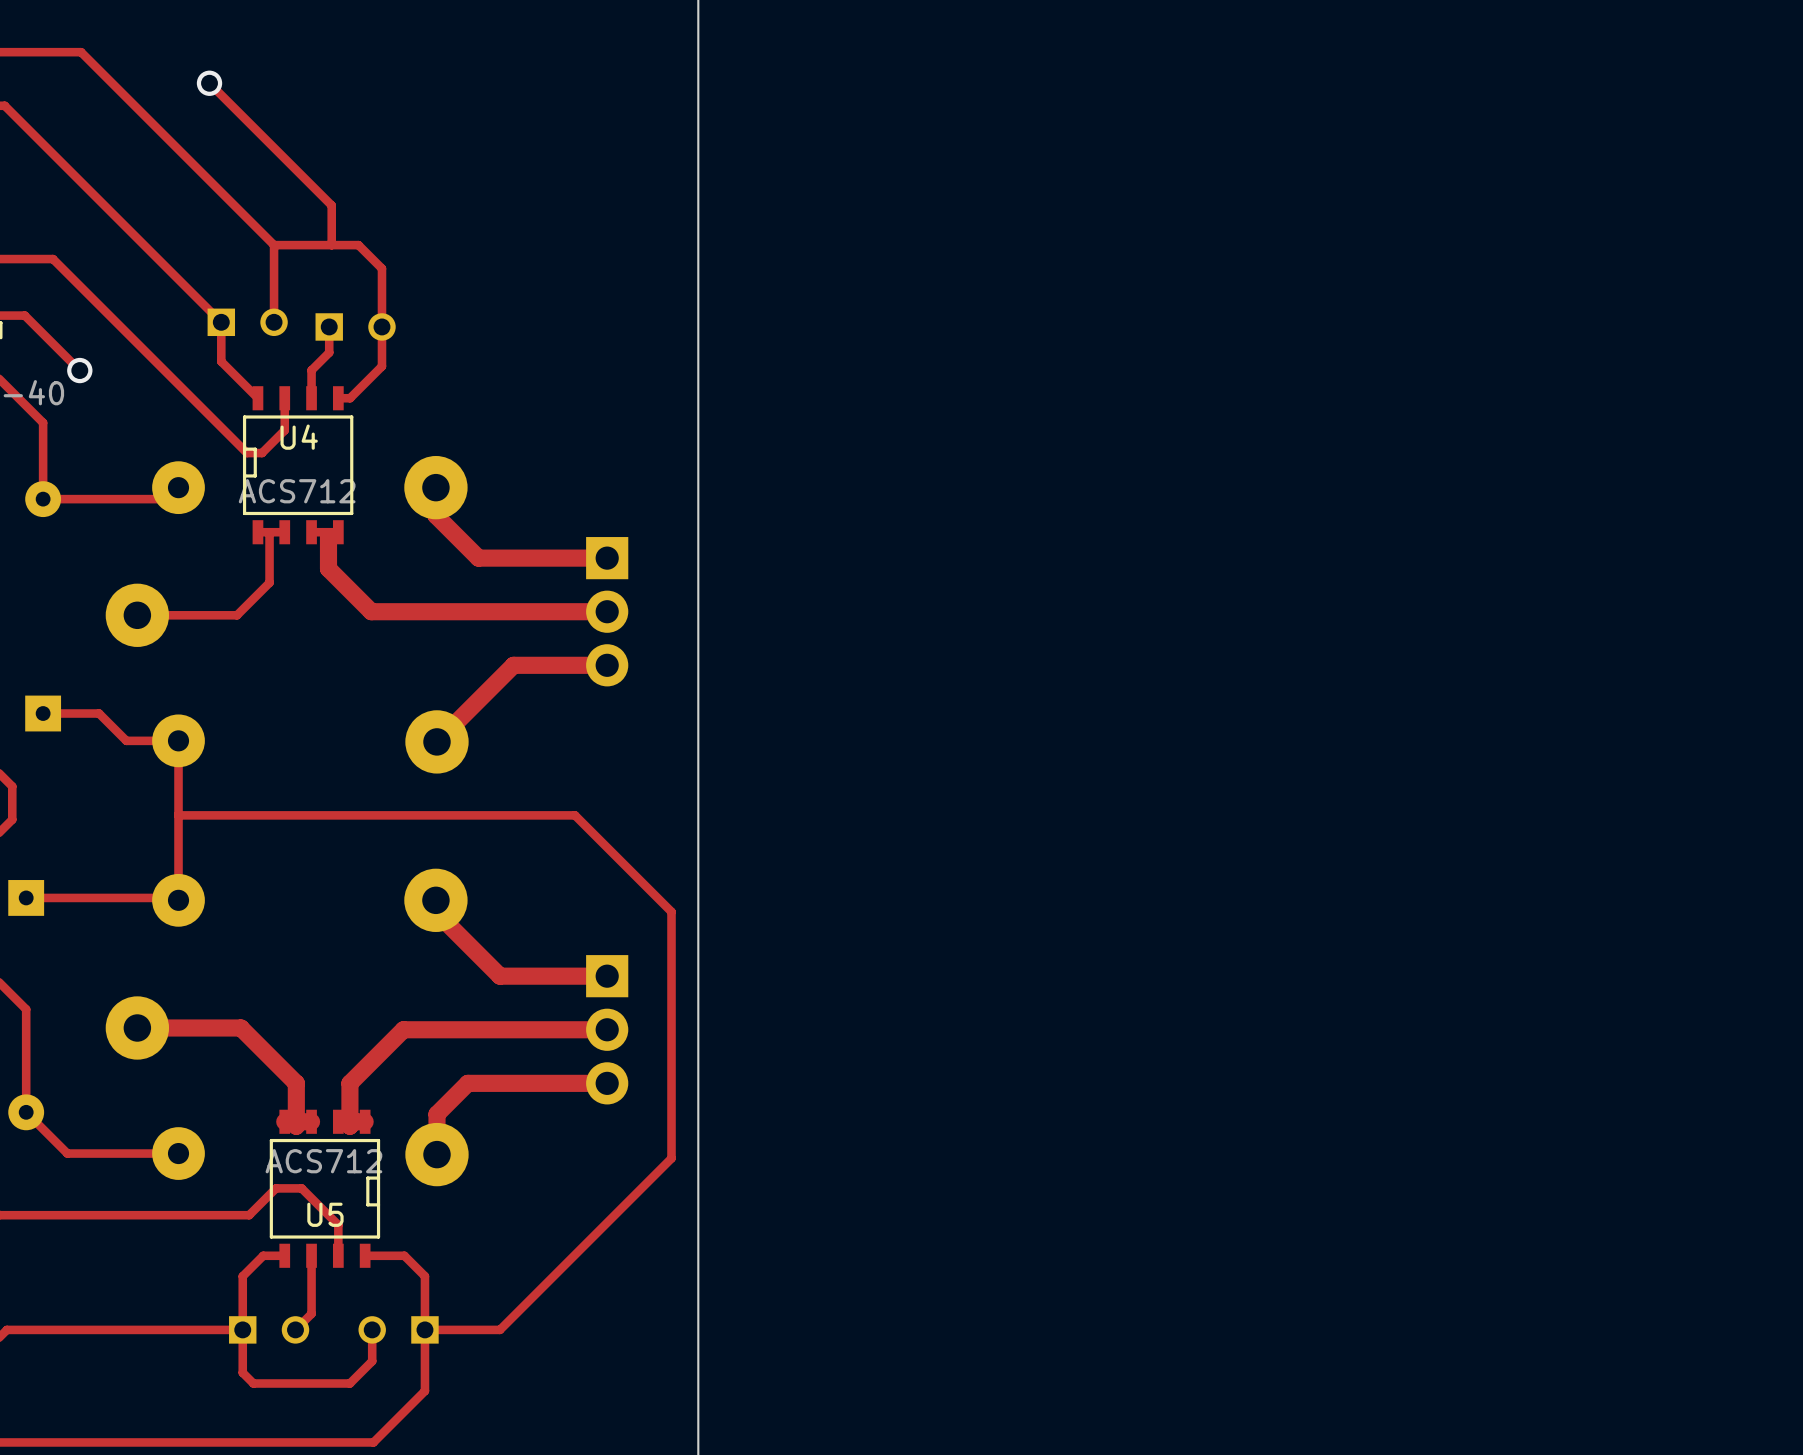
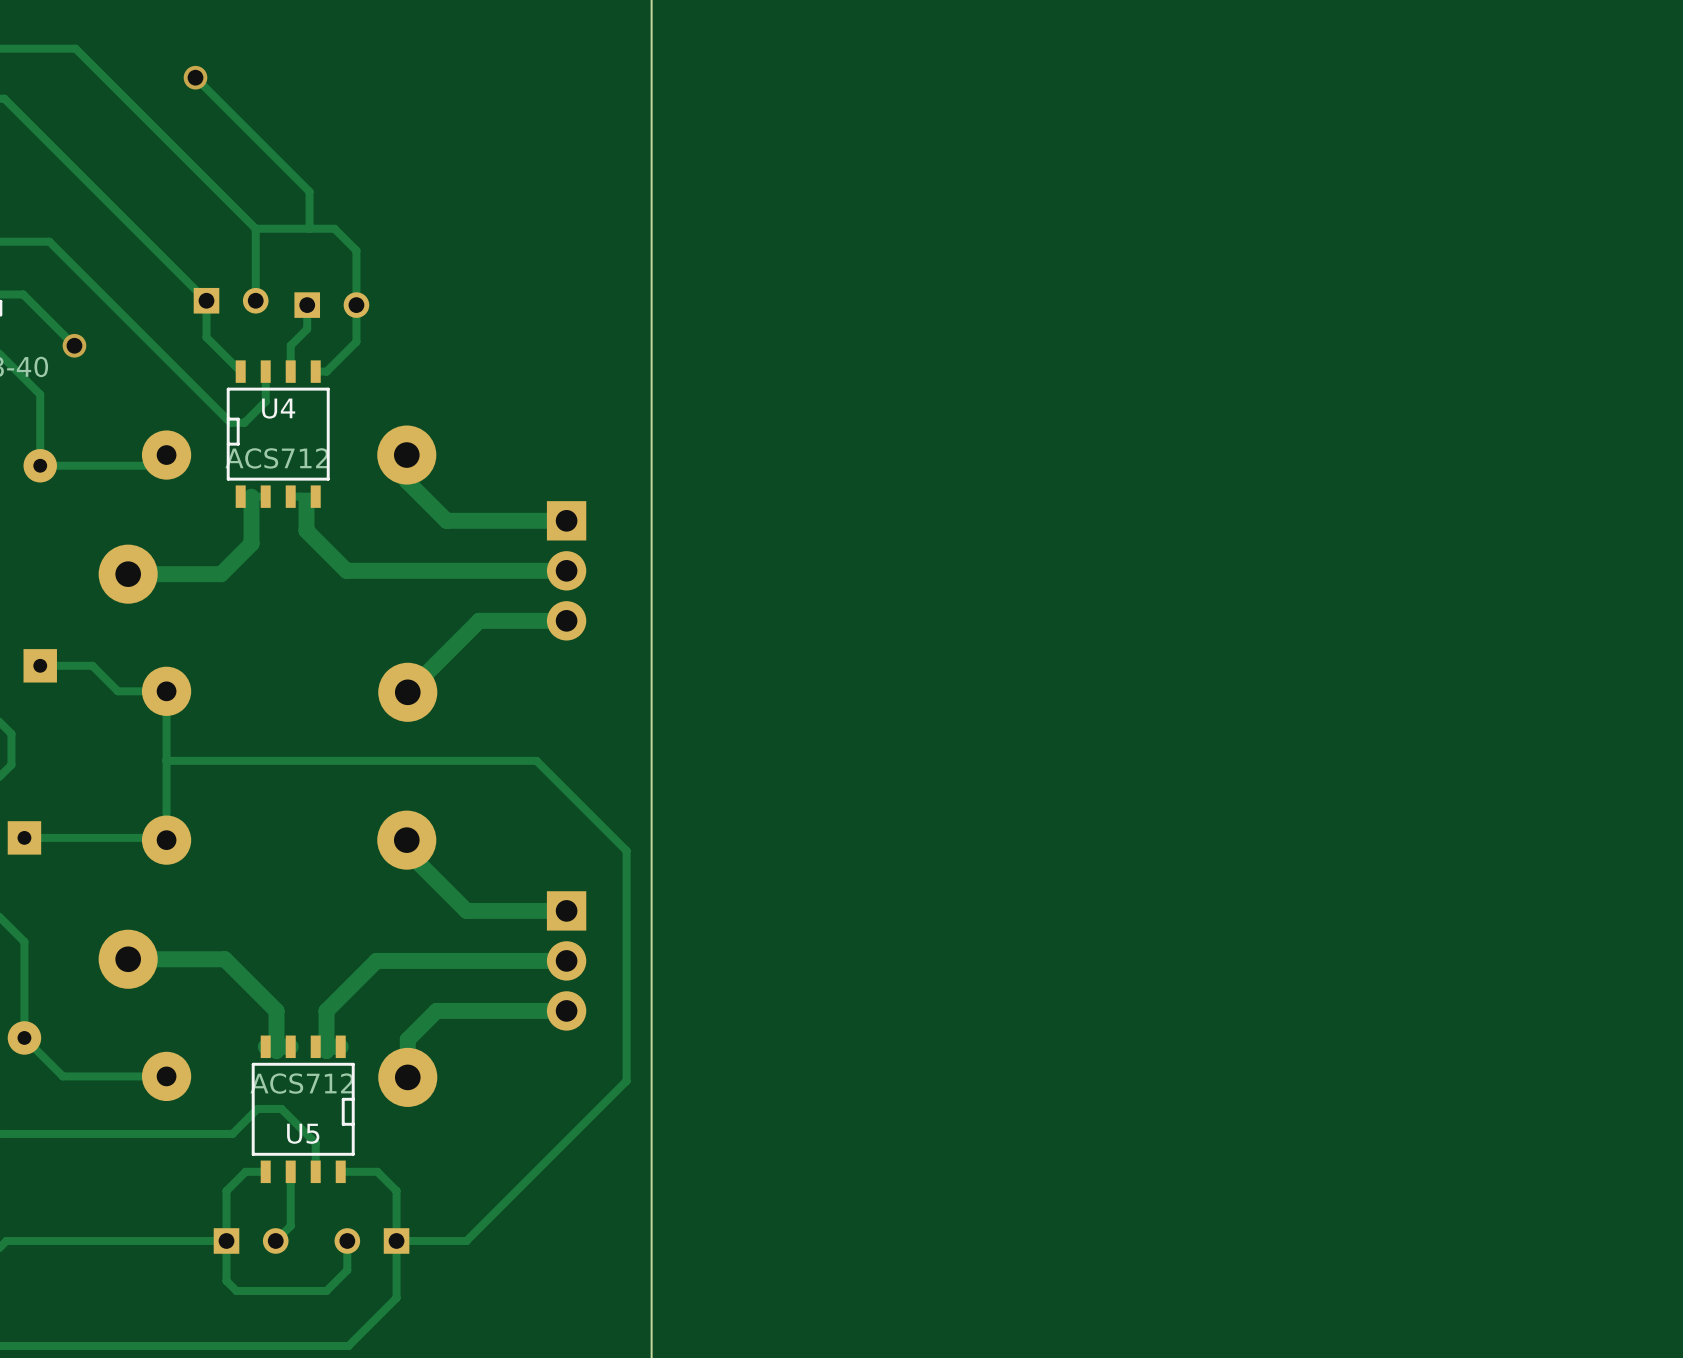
track width: thin (269, 532) (269, 582) (237, 615) (137, 615) -> thick (251, 496) (251, 543) (221, 574) (128, 574)

